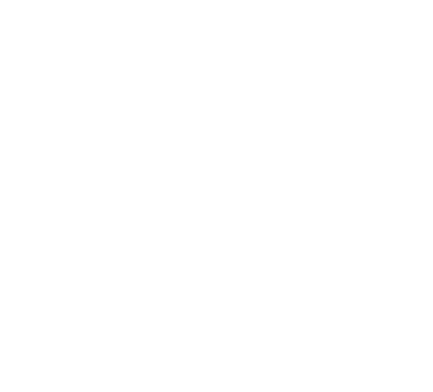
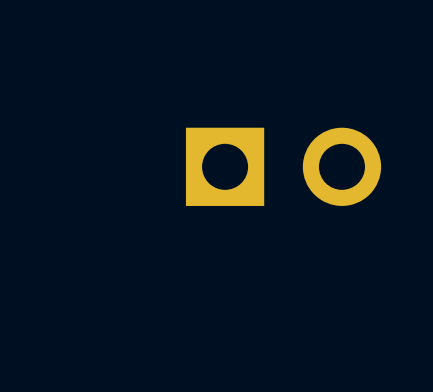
part: none -> (283, 166)

